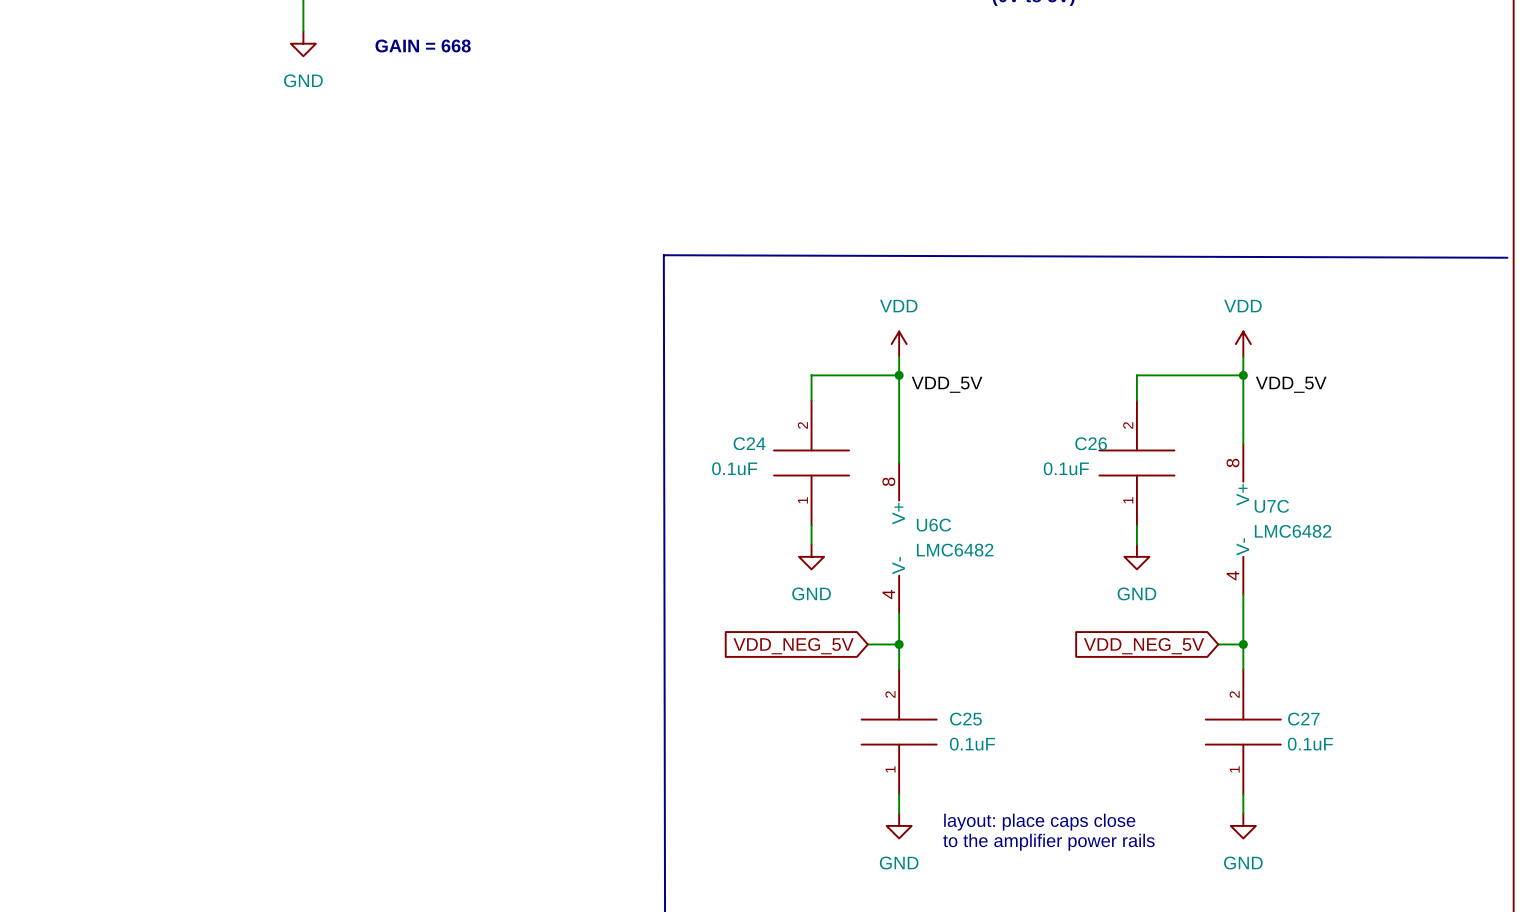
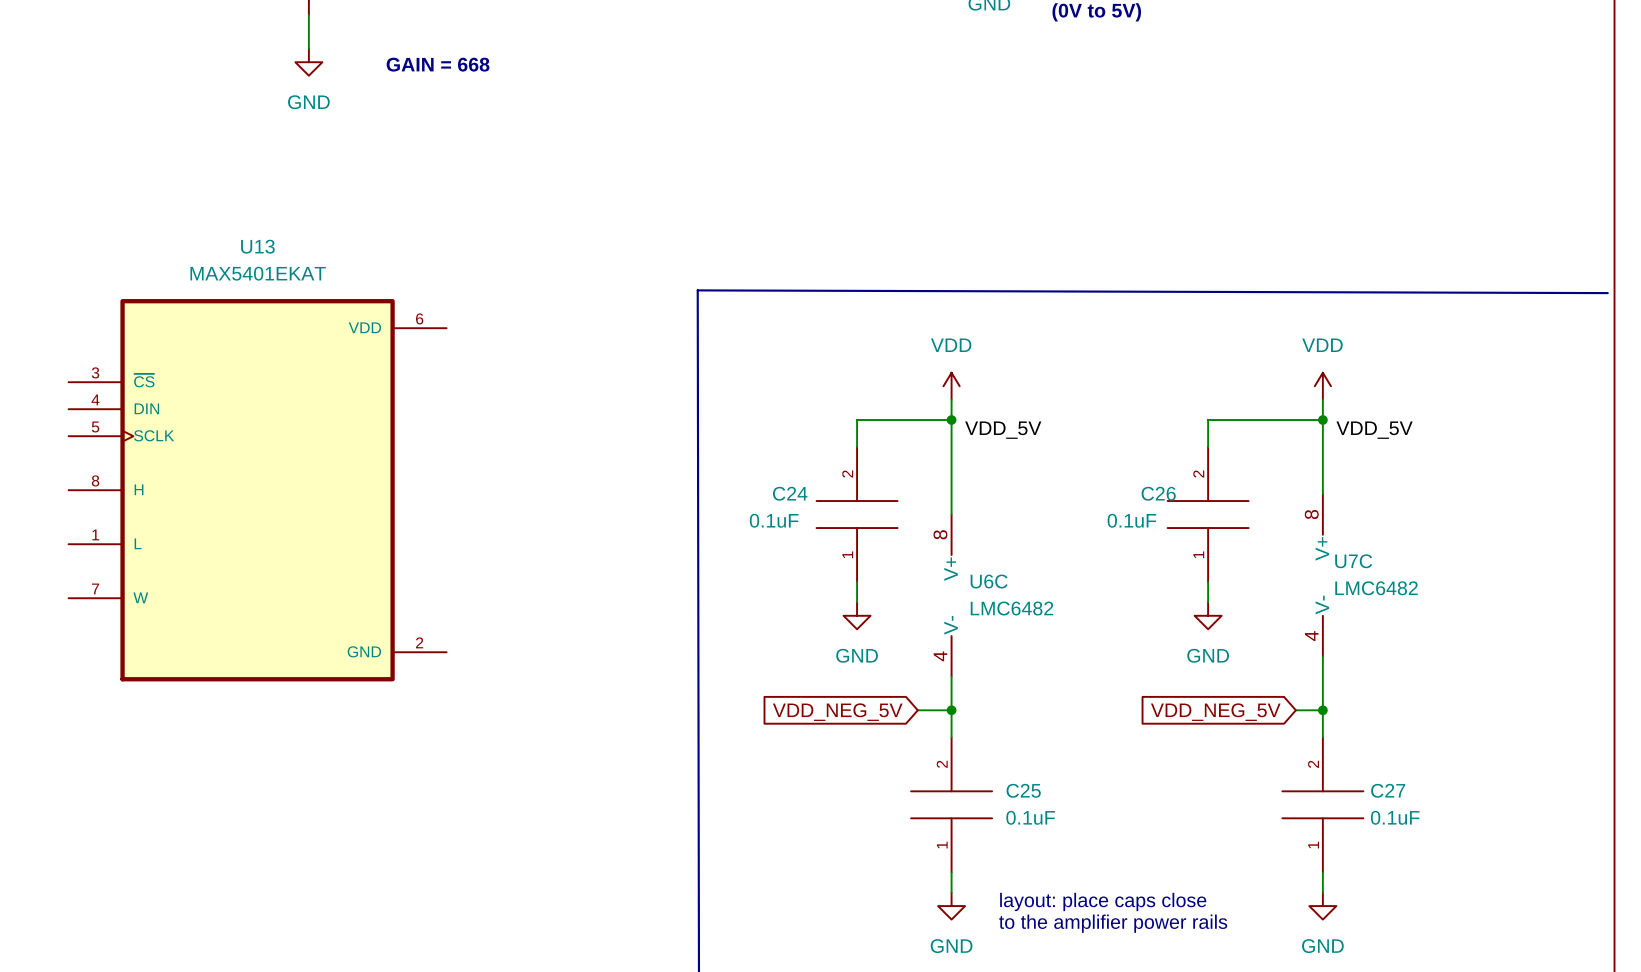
U13: none -> MAX5401EKAT (257, 490)

